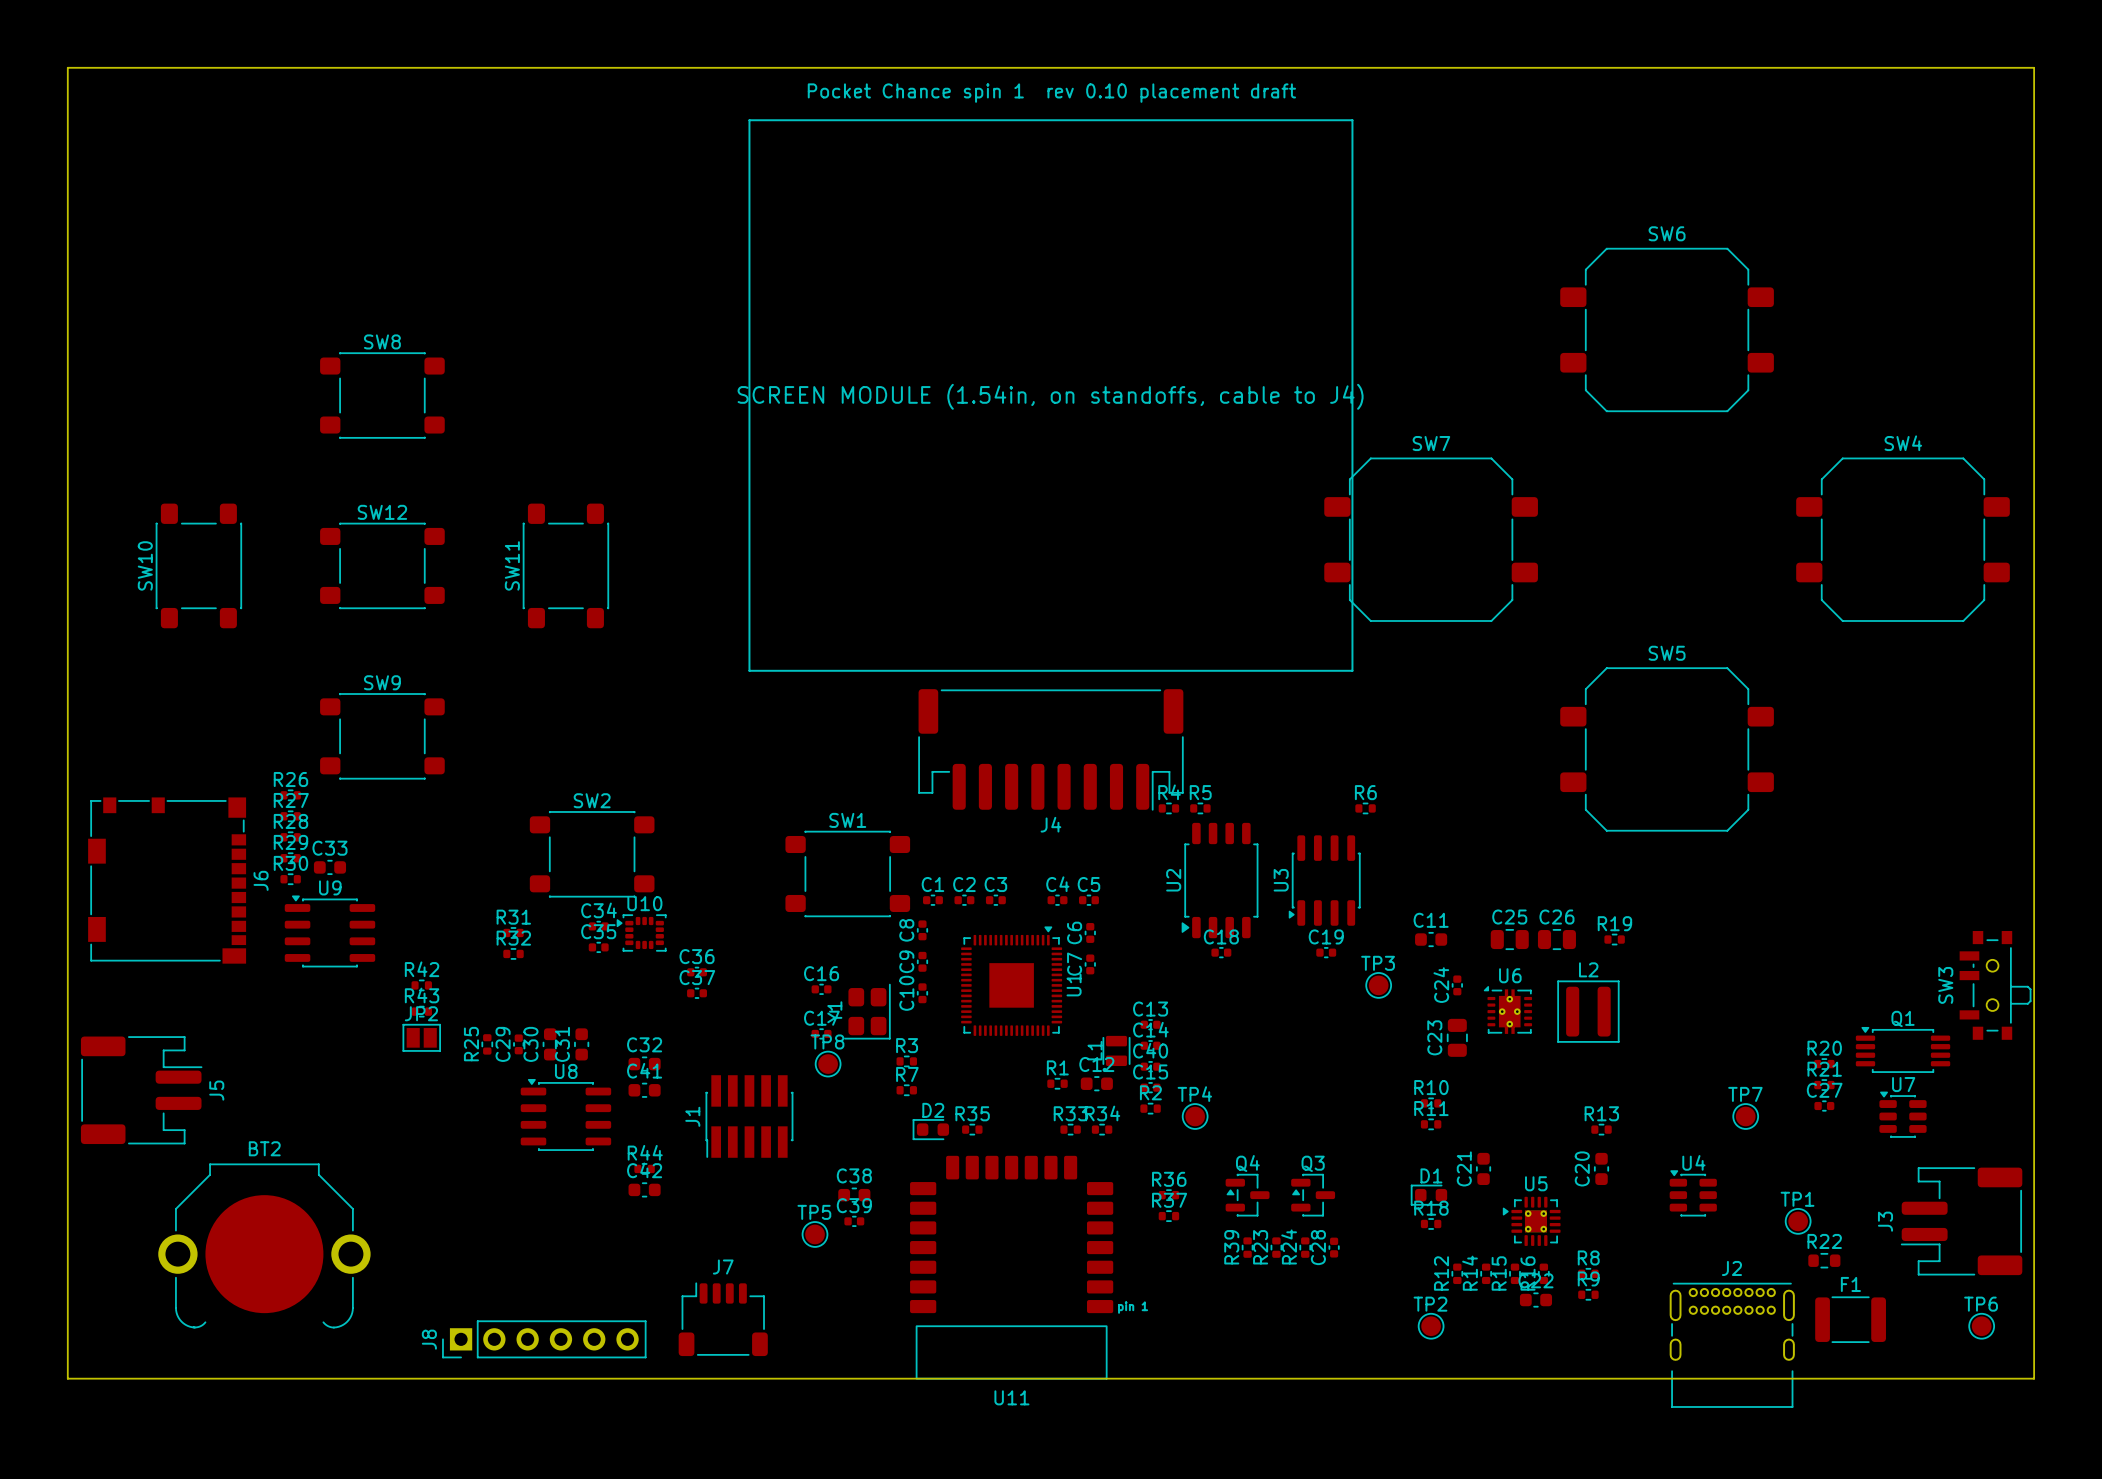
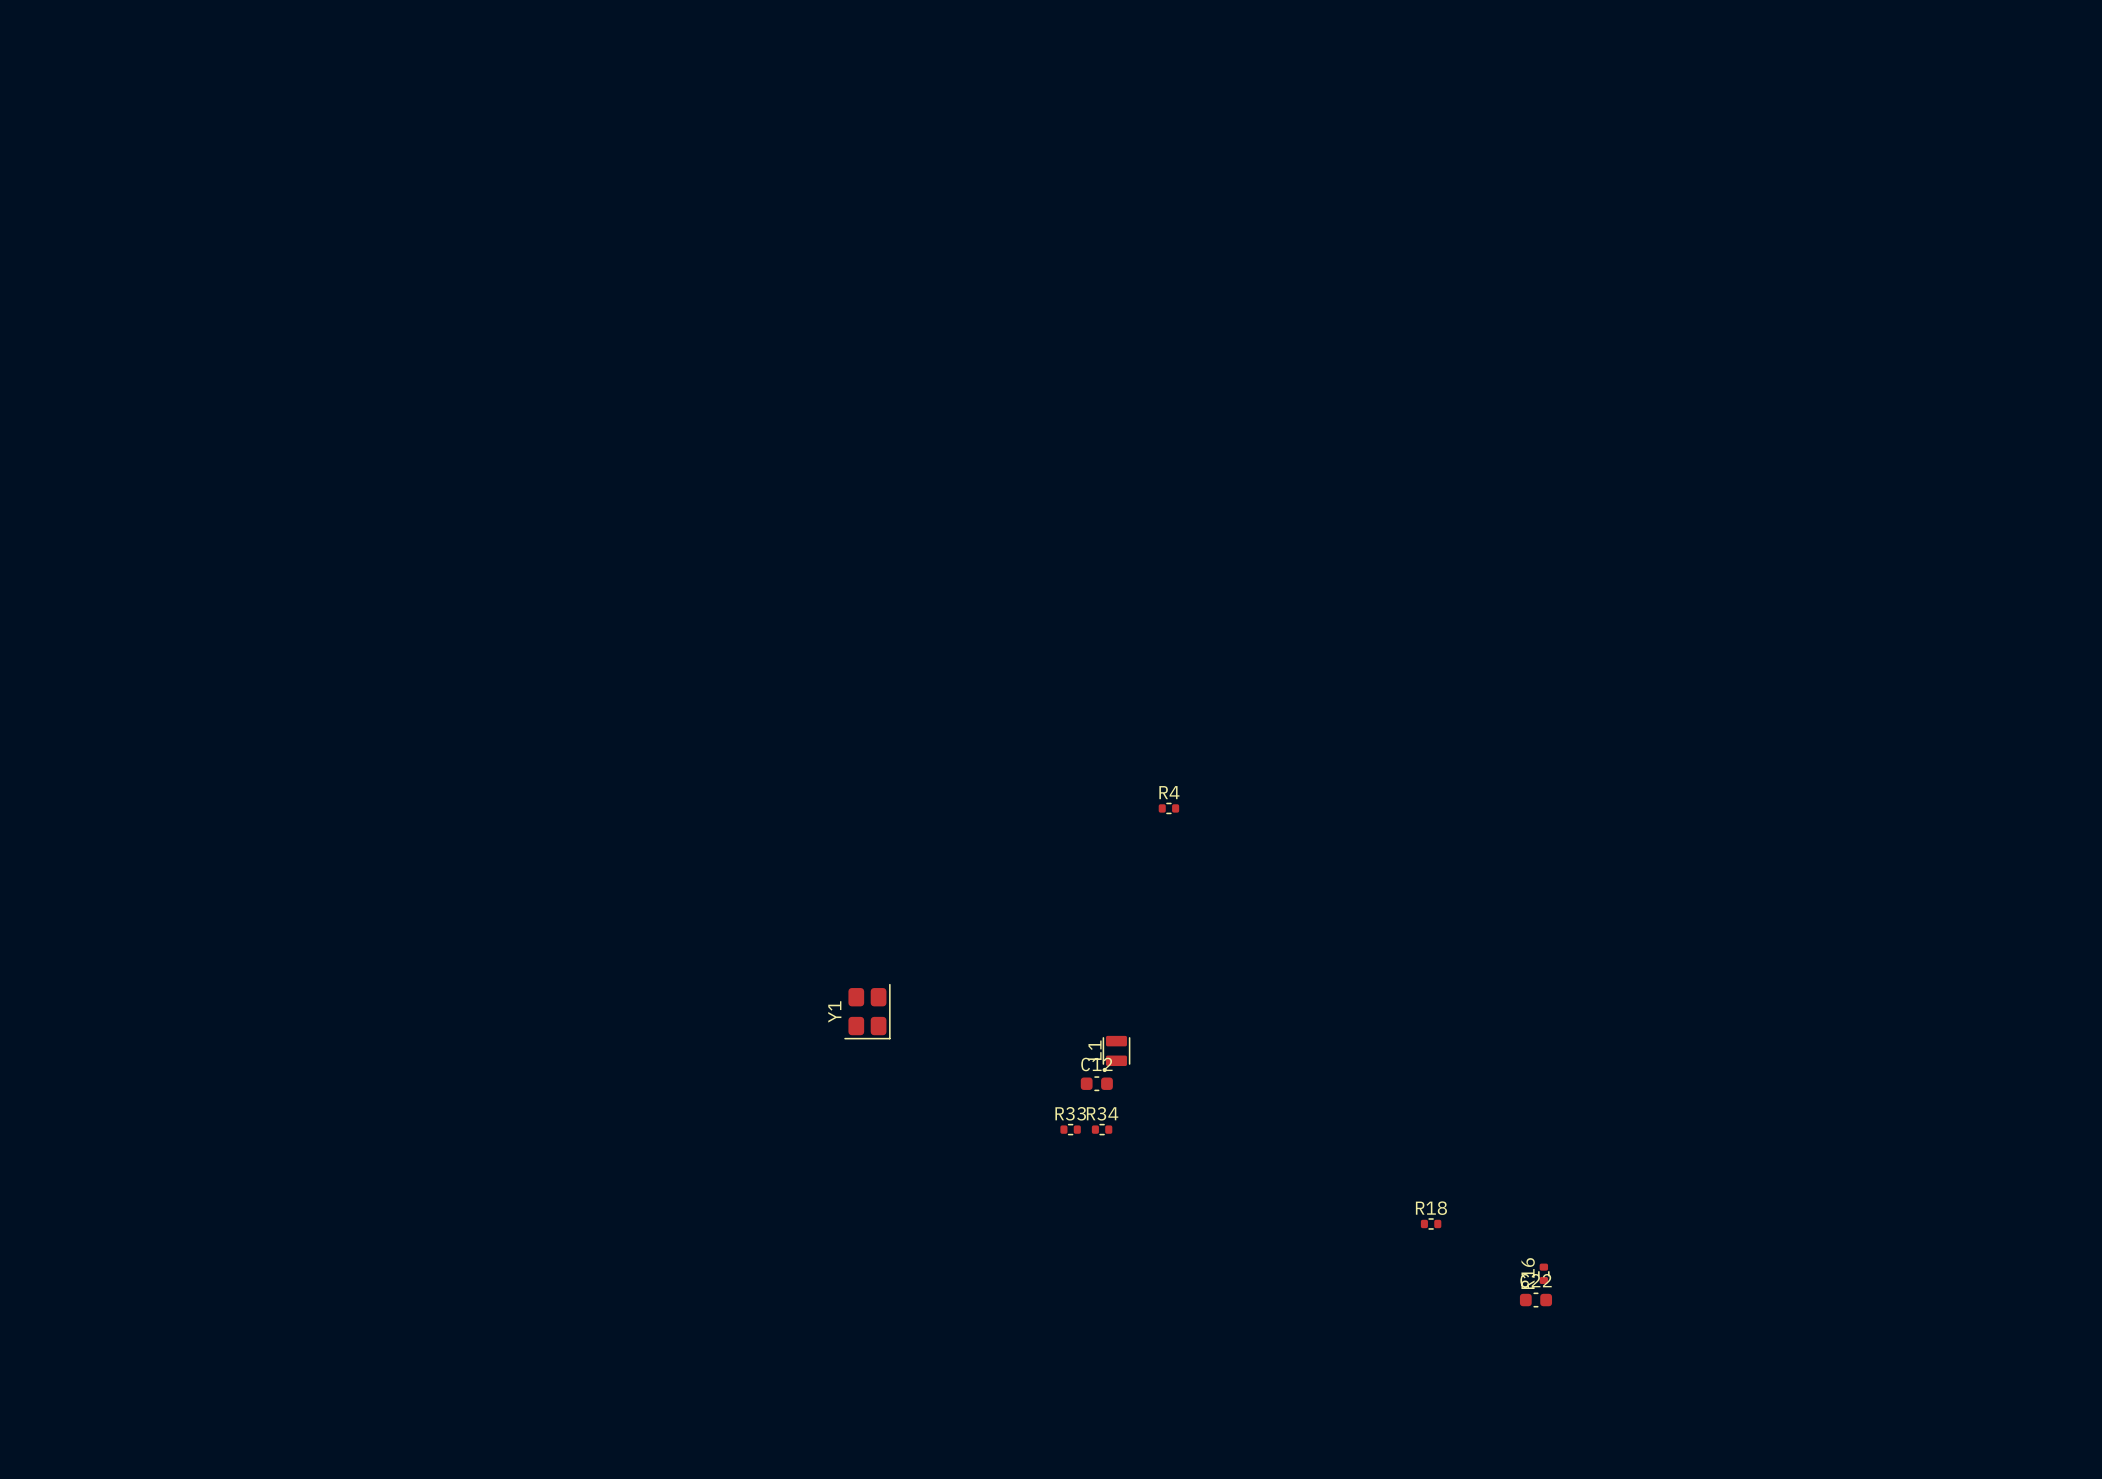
board edge: (67, 67) (2034, 67) (2034, 1378) (67, 1378) (67, 67) -> none
text: Pocket Chance spin 1 rev 0.10 placement draft (1051, 93) -> none
line: (749, 120) (1352, 120) (1352, 670) (749, 670) (749, 120) -> none
SW6: (1667, 329) -> none
SW8: (382, 395) -> none
text: SCREEN MODULE (1.54in, on standoffs, cable to J4) (1050, 396) -> none
SW7: (1431, 539) -> none
SW4: (1903, 539) -> none
SW10: (198, 565) -> none
SW12: (382, 565) -> none
SW11: (565, 565) -> none
SW9: (382, 736) -> none
J4: (1050, 749) -> none
SW5: (1667, 749) -> none
R26: (290, 795) -> none
R5: (1200, 808) -> none
R6: (1365, 808) -> none
R27: (290, 816) -> none
R28: (290, 837) -> none
SW2: (592, 854) -> none
R29: (290, 858) -> none
C33: (329, 867) -> none
SW1: (847, 873) -> none
R30: (290, 879) -> none
J6: (167, 880) -> none
U2: (1219, 880) -> none
U3: (1324, 880) -> none
C1: (932, 900) -> none
C2: (964, 900) -> none
C3: (995, 900) -> none
C4: (1057, 900) -> none
C5: (1088, 900) -> none
C34: (598, 926) -> none
C8: (922, 930) -> none
U9: (329, 931) -> none
R31: (513, 932) -> none
U10: (641, 932) -> none
C6: (1090, 932) -> none
C11: (1431, 939) -> none
C25: (1509, 939) -> none
C26: (1556, 939) -> none
R19: (1614, 939) -> none
C35: (598, 947) -> none
C18: (1221, 952) -> none
C19: (1326, 952) -> none
R32: (513, 953) -> none
C9: (922, 961) -> none
C7: (1090, 964) -> none
C36: (697, 972) -> none
U1: (1011, 981) -> none
R42: (421, 985) -> none
TP3: (1378, 985) -> none
C24: (1457, 985) -> none
SW3: (1995, 985) -> none
C16: (821, 989) -> none
C37: (697, 993) -> none
C10: (922, 993) -> none
U6: (1507, 1009) -> none
R43: (421, 1011) -> none
L2: (1588, 1011) -> none
C13: (1150, 1024) -> none
C17: (821, 1033) -> none
JP2: (421, 1037) -> none
C23: (1457, 1037) -> none
R25: (487, 1044) -> none
C29: (518, 1044) -> none
C30: (550, 1044) -> none
C31: (581, 1044) -> none
C14: (1150, 1045) -> none
Q1: (1903, 1049) -> none
R3: (906, 1061) -> none
C32: (644, 1064) -> none
TP8: (828, 1064) -> none
R20: (1824, 1064) -> none
C40: (1150, 1066) -> none
R1: (1057, 1083) -> none
R21: (1824, 1085) -> none
C15: (1150, 1087) -> none
J5: (141, 1090) -> none
C41: (644, 1090) -> none
R7: (906, 1090) -> none
R10: (1431, 1103) -> none
C27: (1824, 1106) -> none
R2: (1150, 1108) -> none
U8: (565, 1114) -> none
U7: (1903, 1114) -> none
J1: (749, 1116) -> none
TP4: (1195, 1116) -> none
TP7: (1745, 1116) -> none
R11: (1431, 1124) -> none
D2: (930, 1129) -> none
R35: (972, 1129) -> none
R13: (1601, 1129) -> none
R44: (644, 1168) -> none
C21: (1483, 1168) -> none
C20: (1601, 1168) -> none
C42: (644, 1189) -> none
U4: (1693, 1193) -> none
C38: (854, 1195) -> none
R36: (1168, 1195) -> none
Q4: (1247, 1195) -> none
Q3: (1313, 1195) -> none
D1: (1429, 1195) -> none
R37: (1168, 1216) -> none
C39: (854, 1221) -> none
U5: (1531, 1221) -> none
TP1: (1798, 1221) -> none
J3: (1961, 1221) -> none
TP5: (815, 1234) -> none
BT2: (264, 1245) -> none
R39: (1247, 1247) -> none
R23: (1276, 1247) -> none
R24: (1305, 1247) -> none
C28: (1334, 1247) -> none
R22: (1824, 1260) -> none
U11: (1011, 1267) -> none
R12: (1457, 1273) -> none
R14: (1486, 1273) -> none
R15: (1515, 1273) -> none
R8: (1588, 1273) -> none
R9: (1588, 1294) -> none
J7: (723, 1319) -> none
F1: (1850, 1319) -> none
TP2: (1431, 1326) -> none
TP6: (1981, 1326) -> none
J8: (544, 1339) -> none
J2: (1732, 1345) -> none

